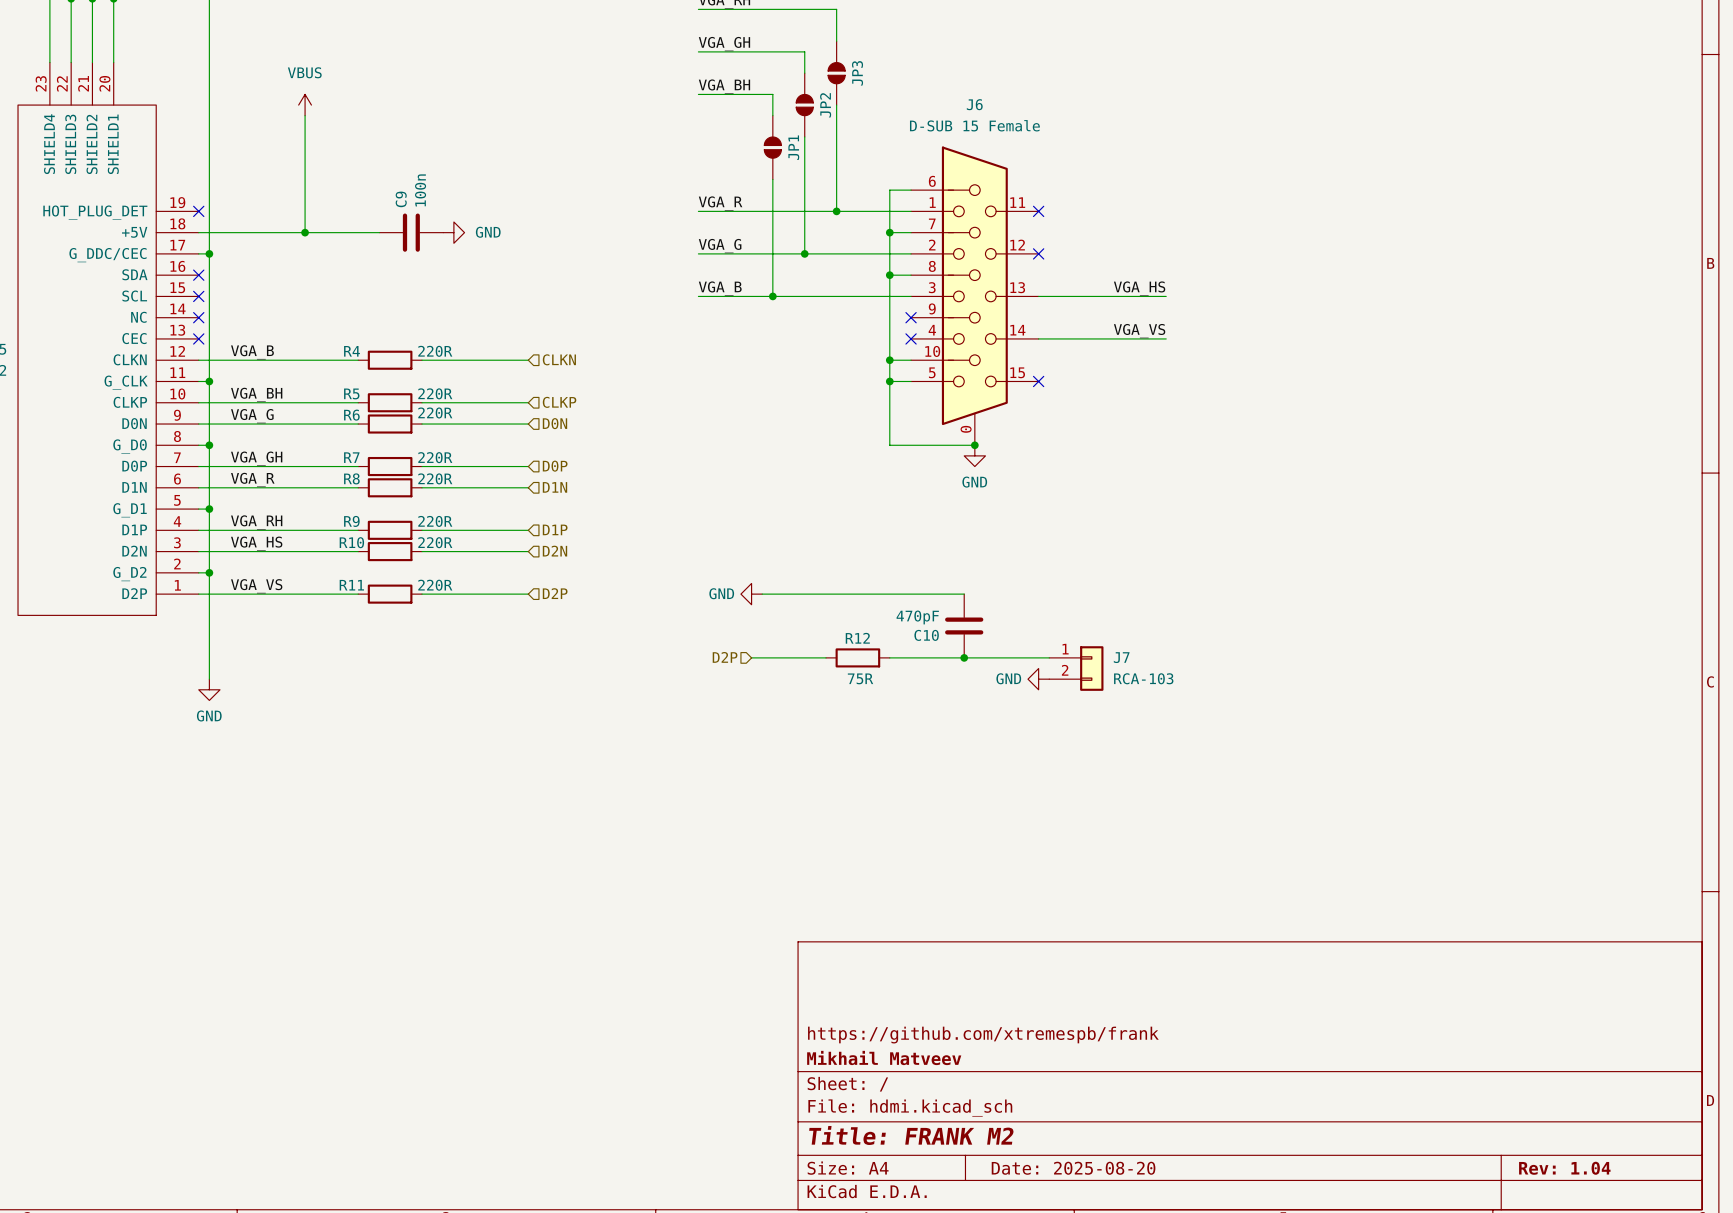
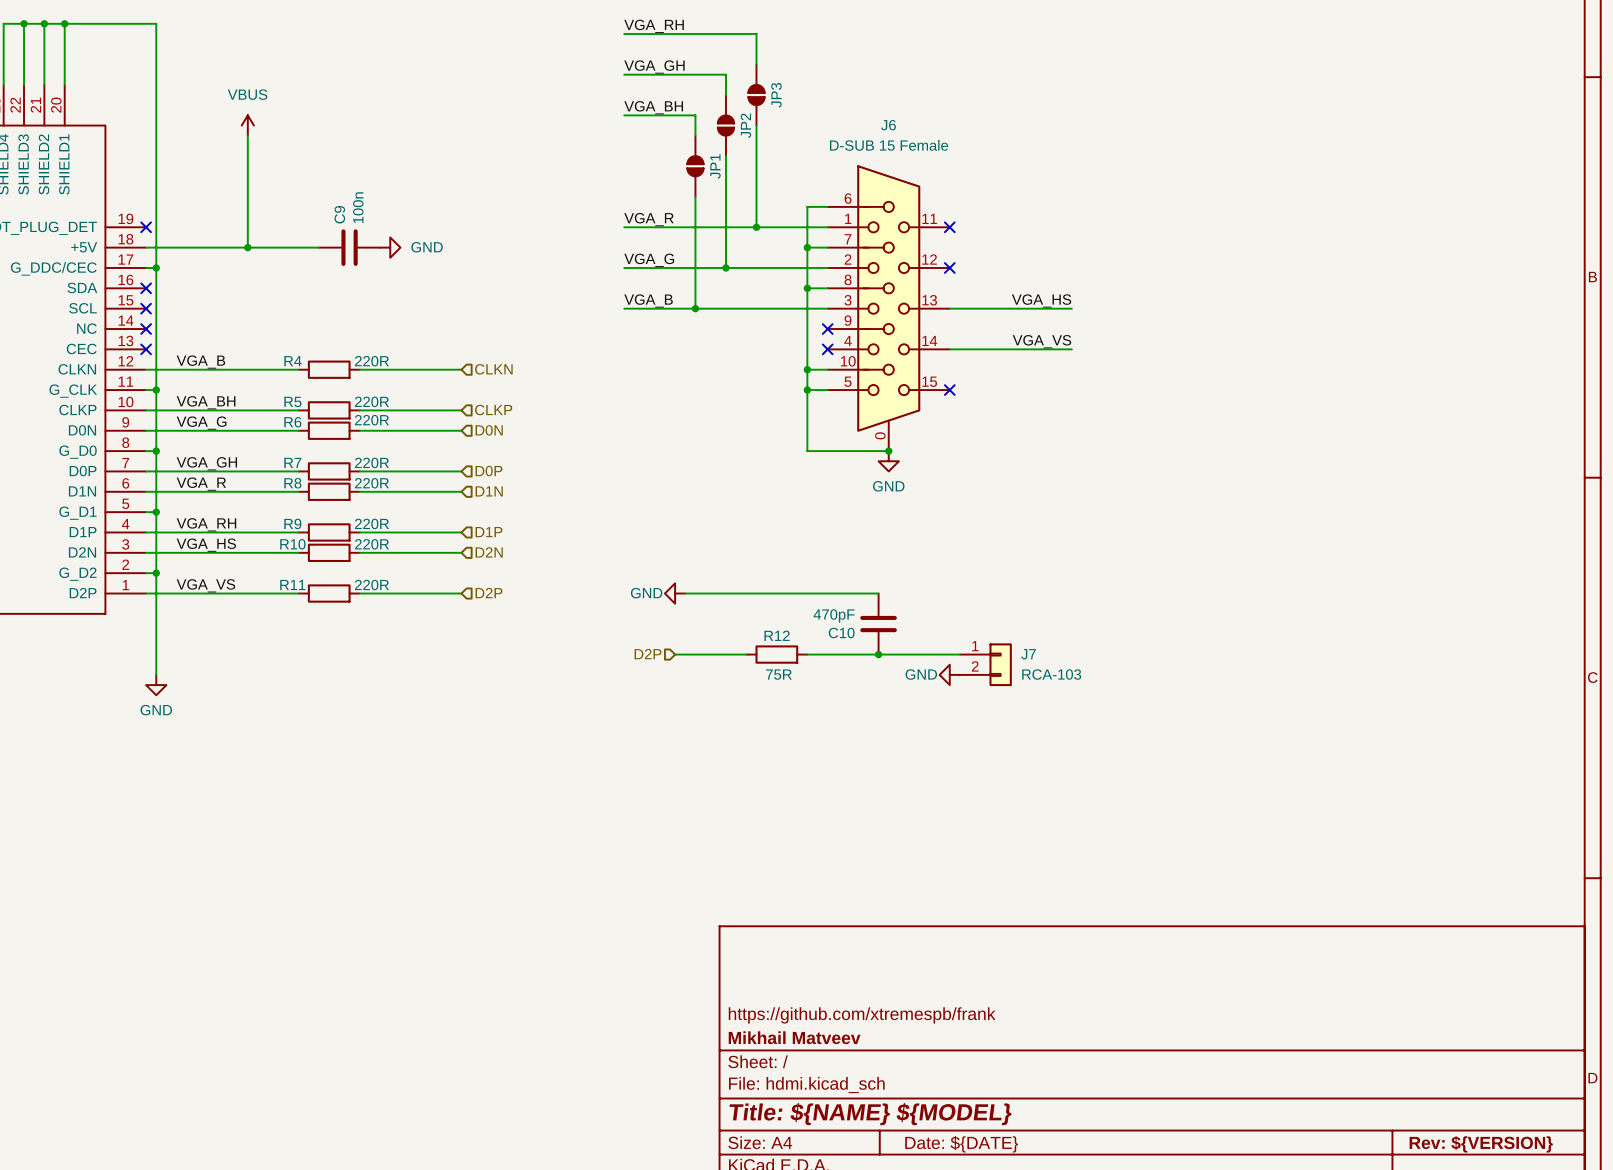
title block: Title: FRANK M2 (911, 1135) -> Title: ${NAME} ${MODEL} (870, 1114)
title block: Date: 2025-08-20 (1073, 1168) -> Date: ${DATE} (961, 1144)
title block: Rev: 1.04 (1564, 1168) -> Rev: ${VERSION} (1481, 1144)

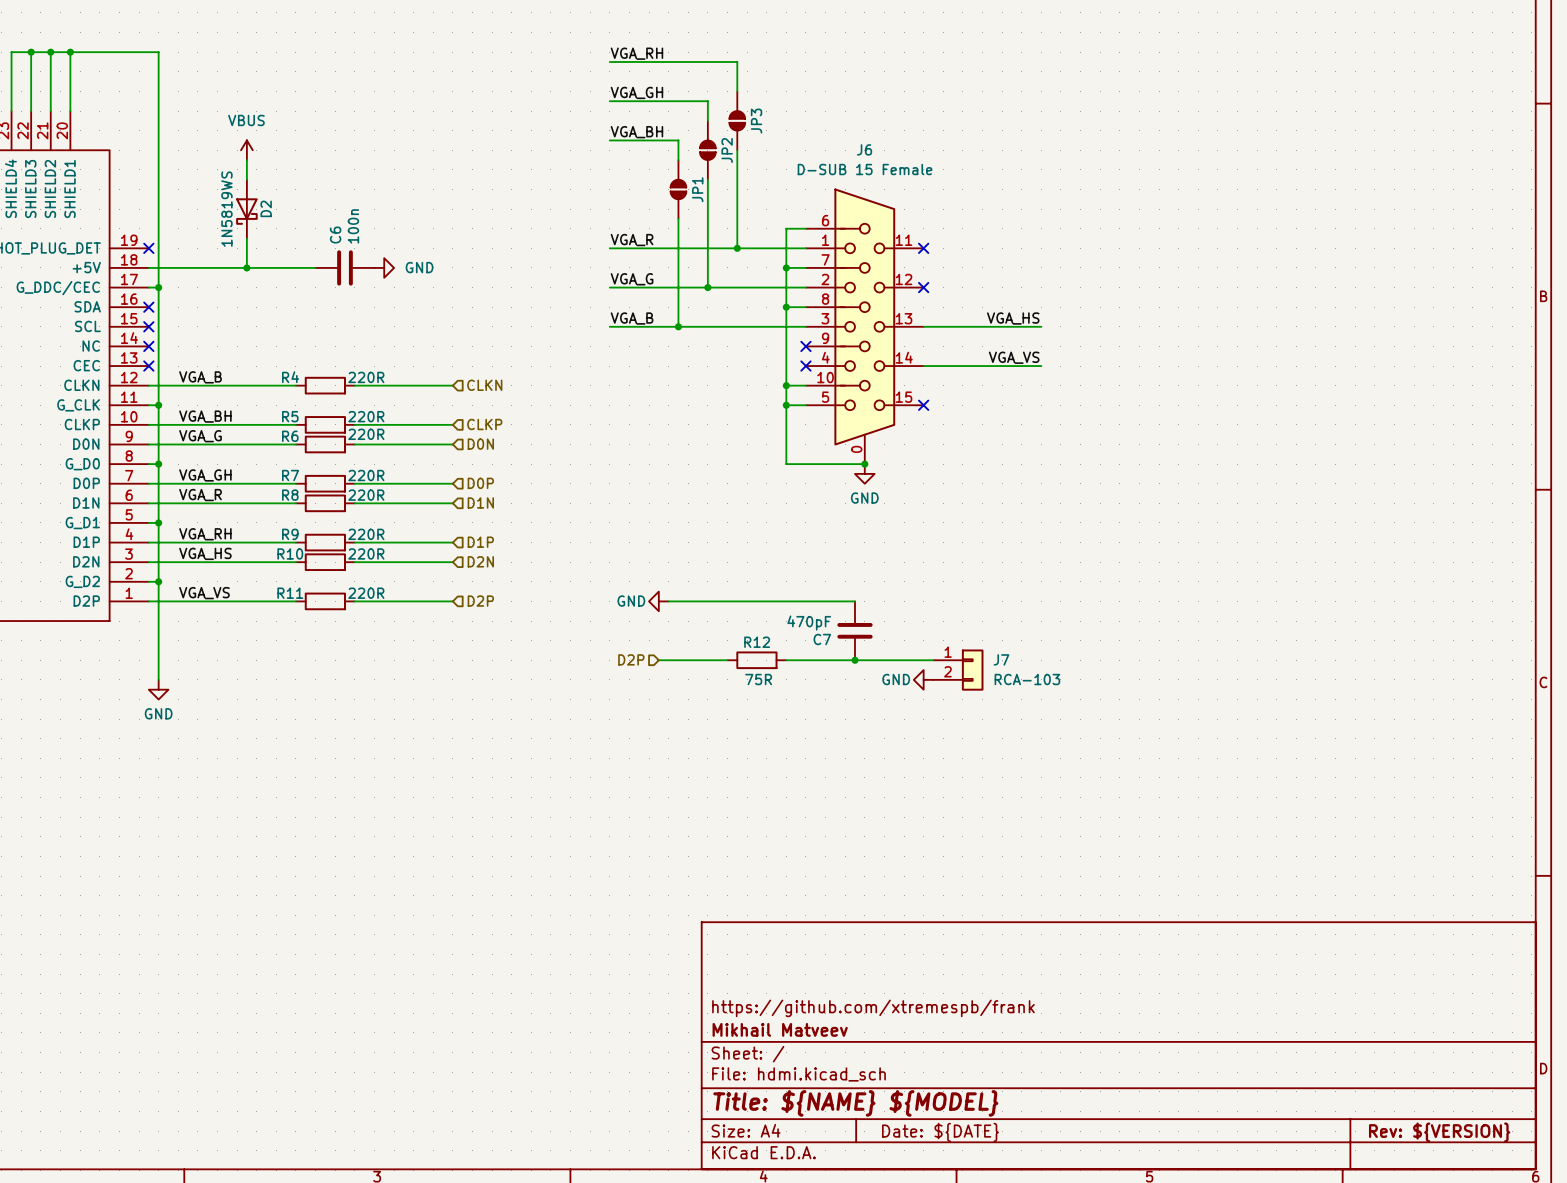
D2: none -> 1N5819WS (246, 209)
C9 name: C9 (339, 214) -> C6 (335, 235)
C10 name: C10 (841, 633) -> C7 (822, 639)

